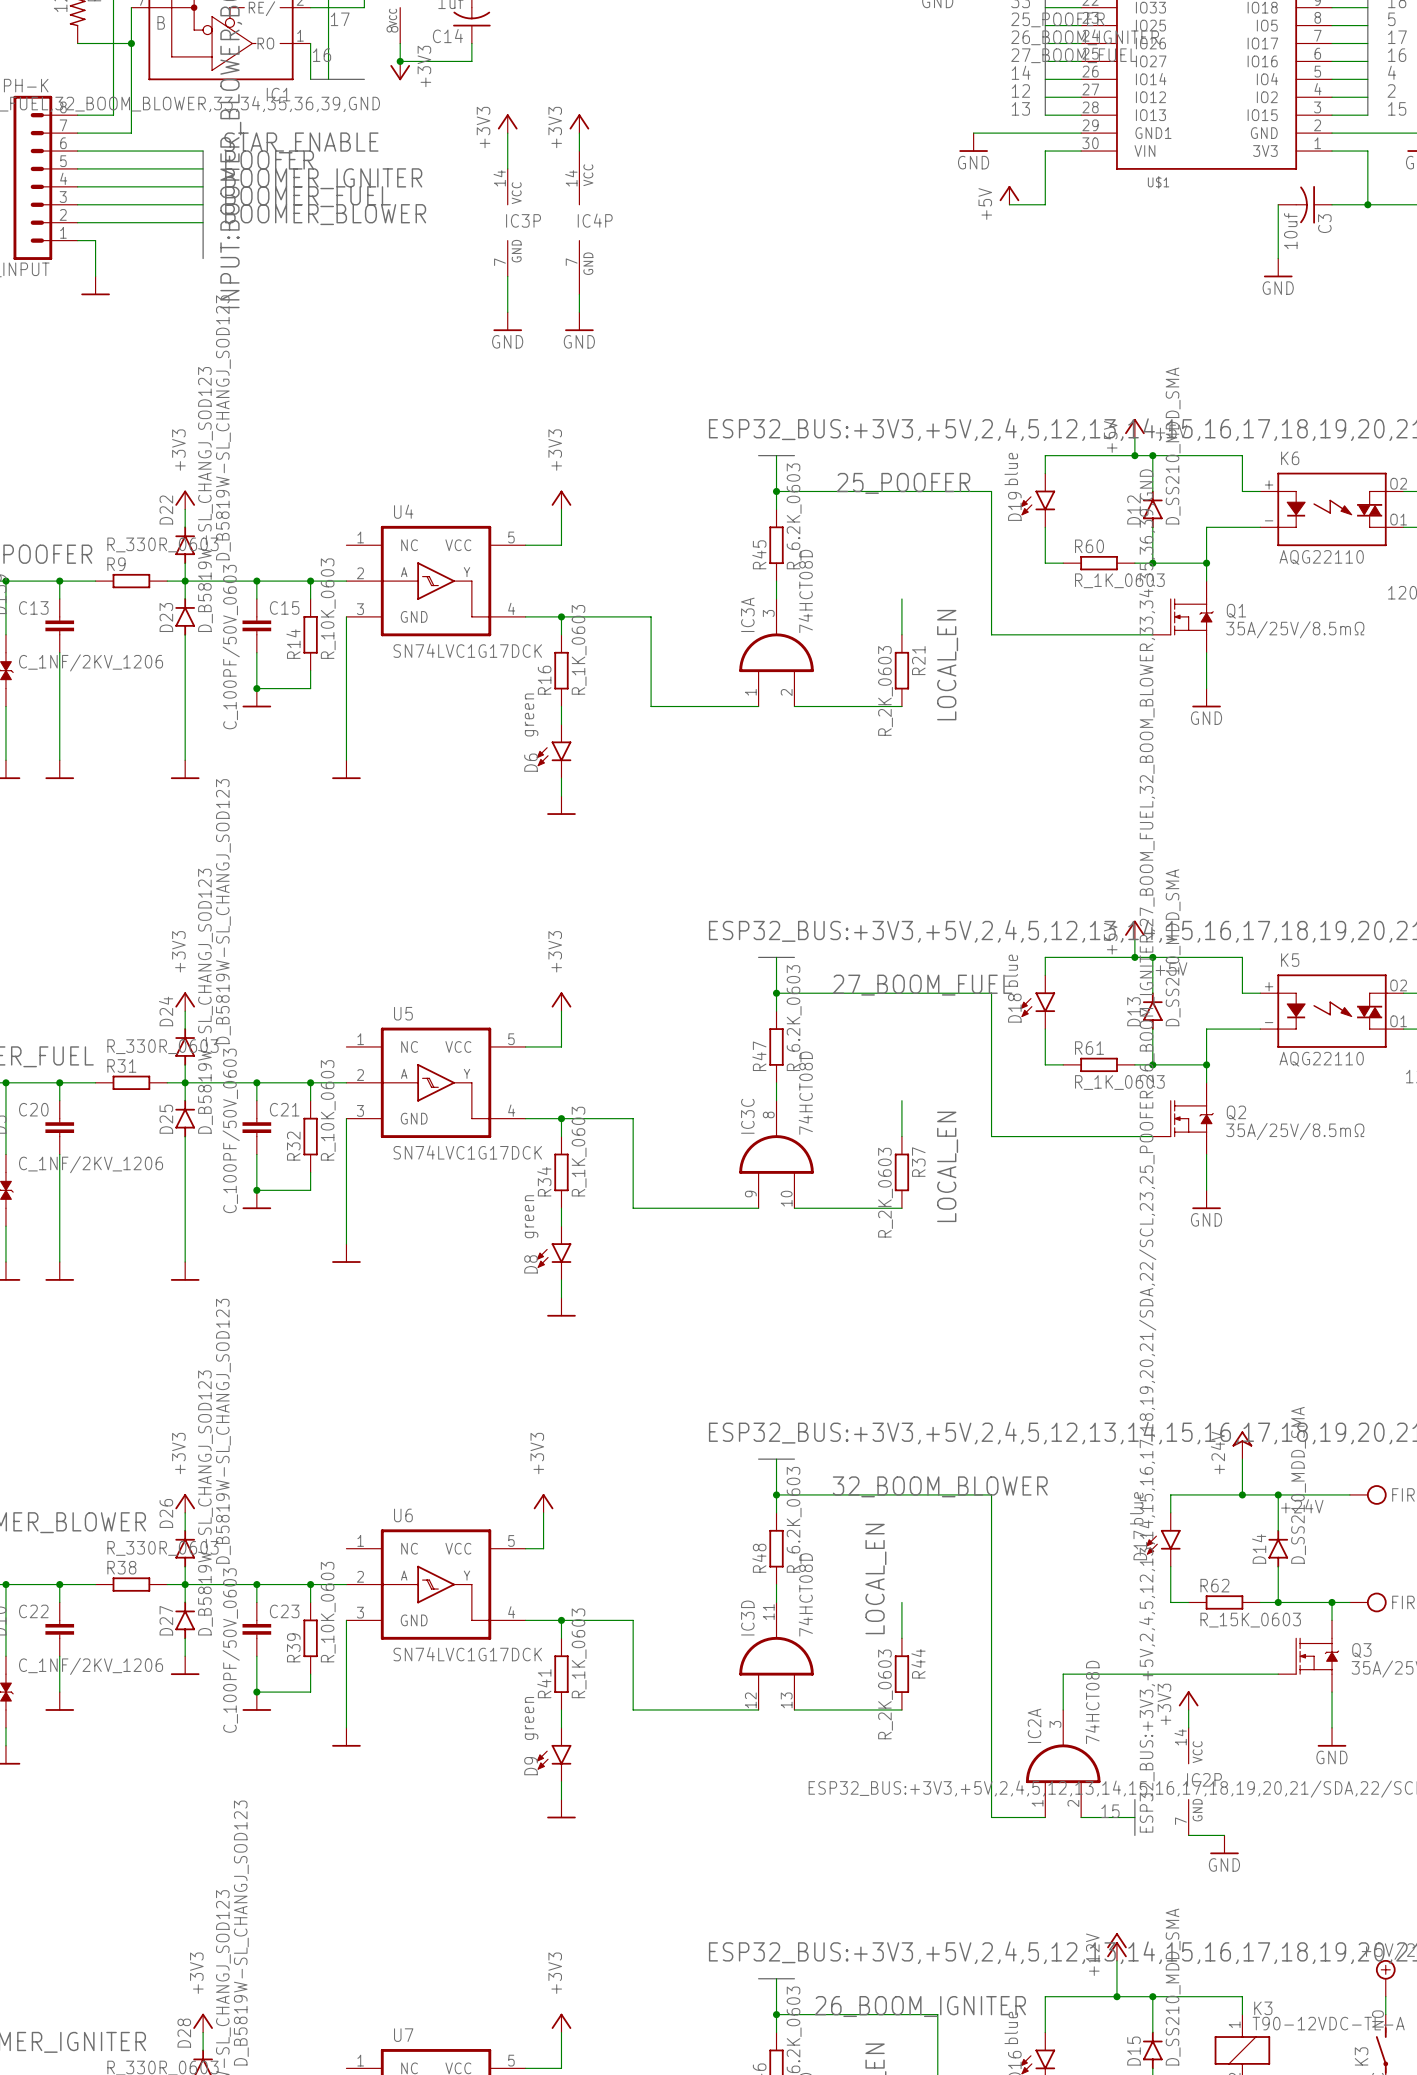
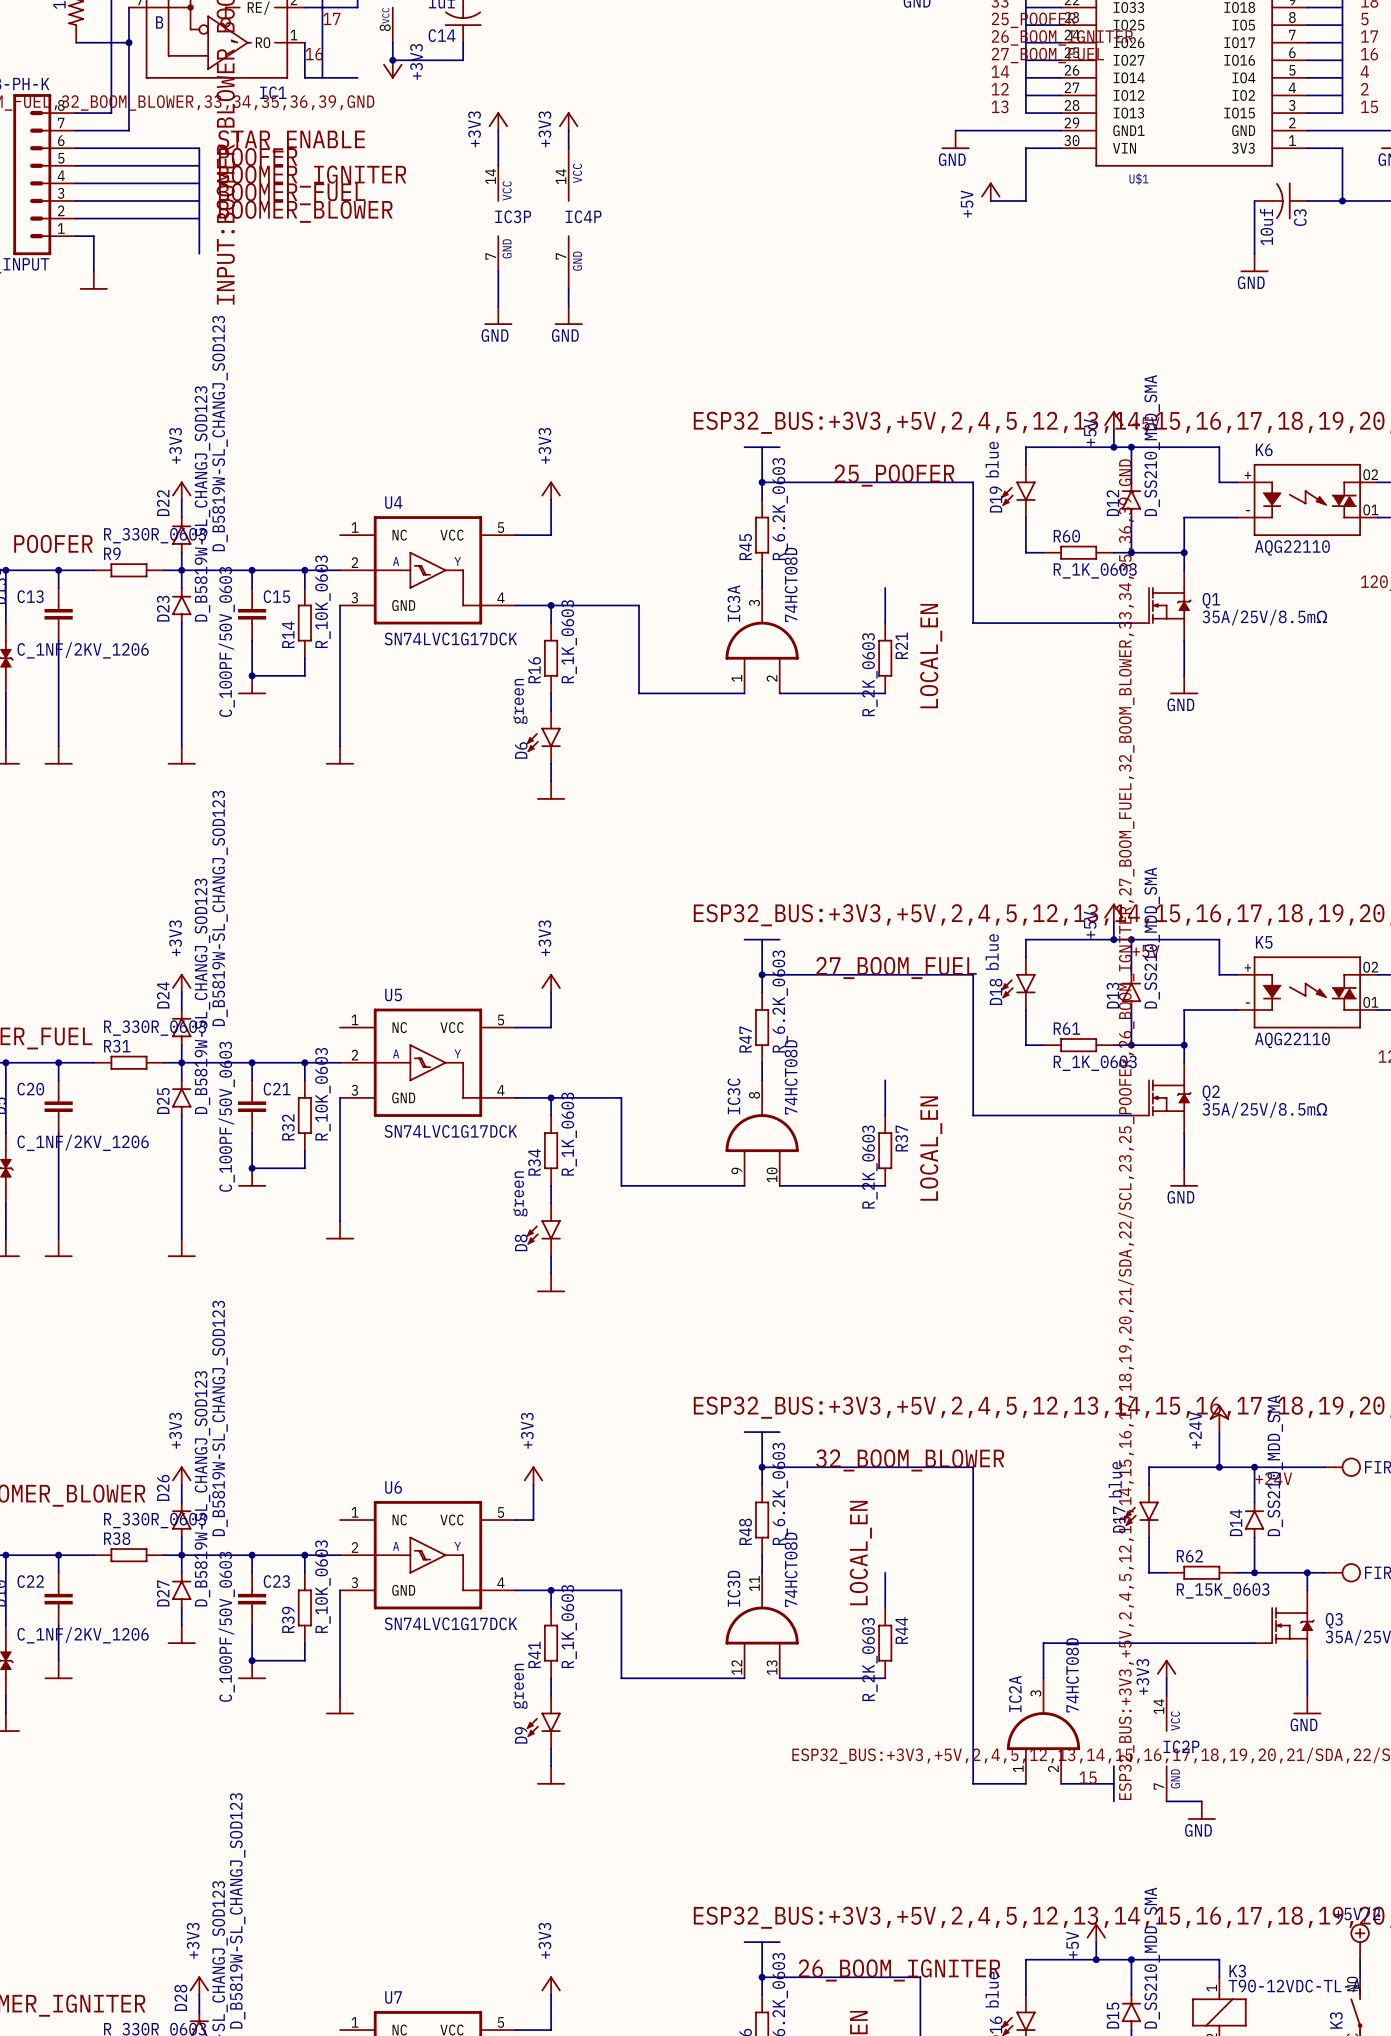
power symbol: +12V (1116, 1946) -> none
power symbol: none -> +5V (1096, 1932)

